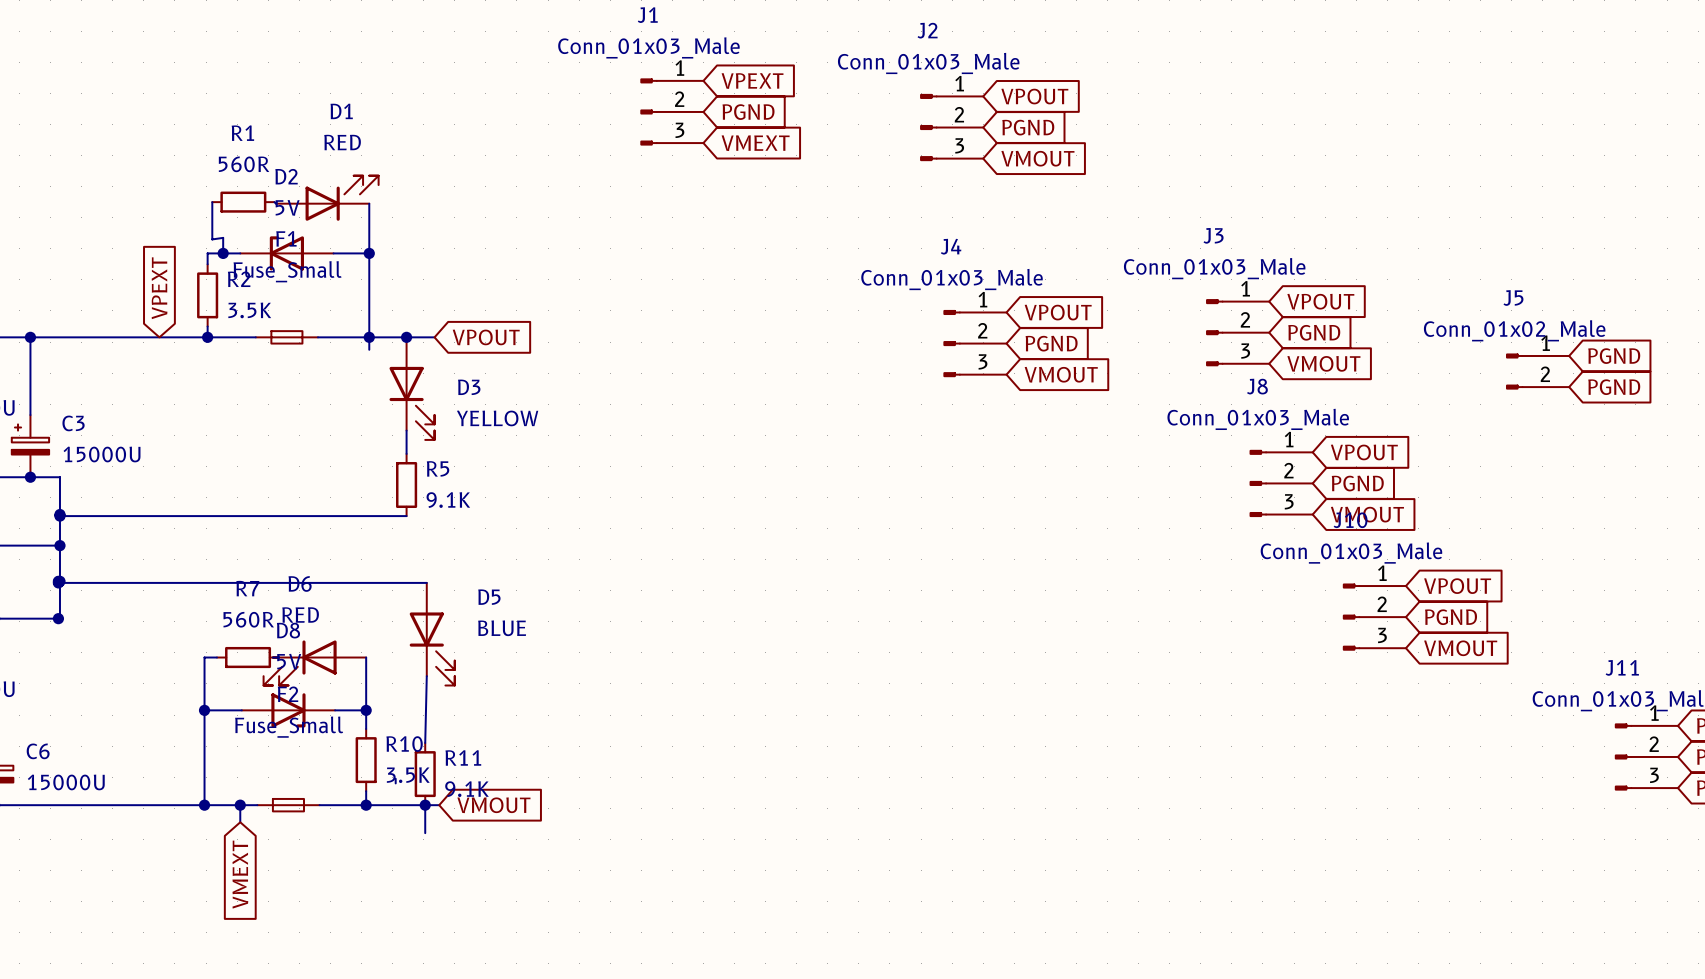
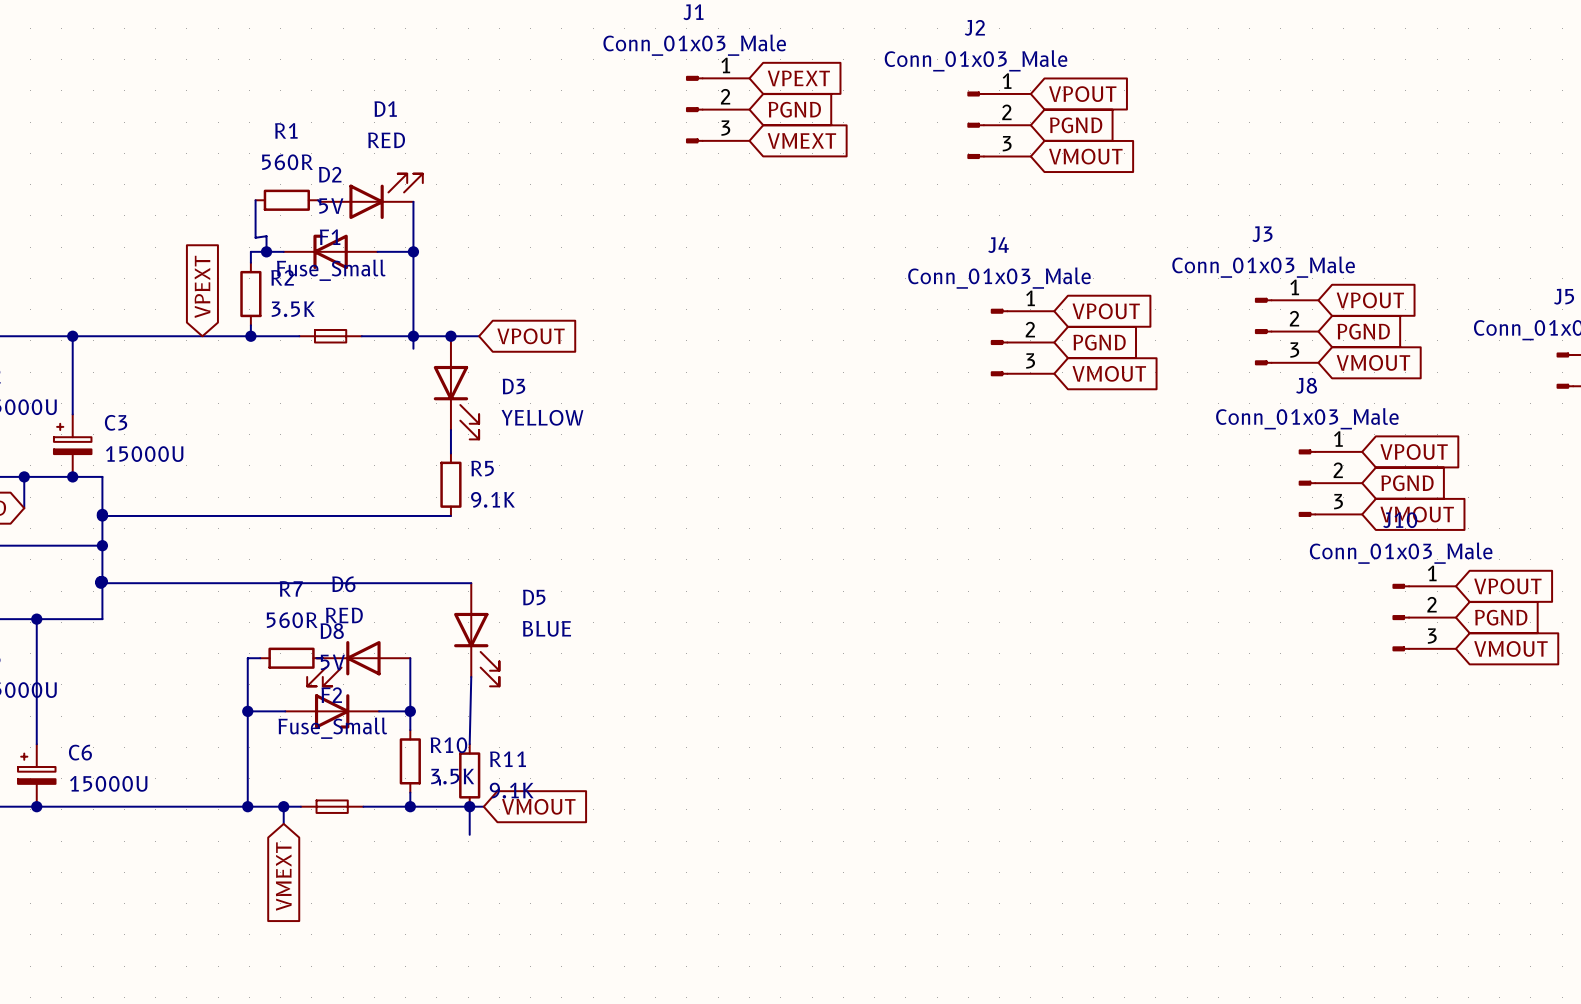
junction: (58, 618) -> none

